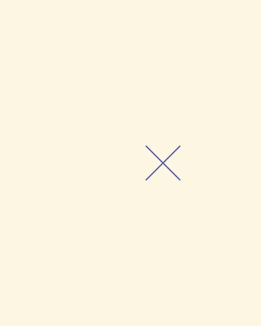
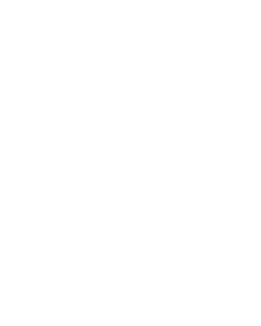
no-connect mark: (163, 163) -> none

